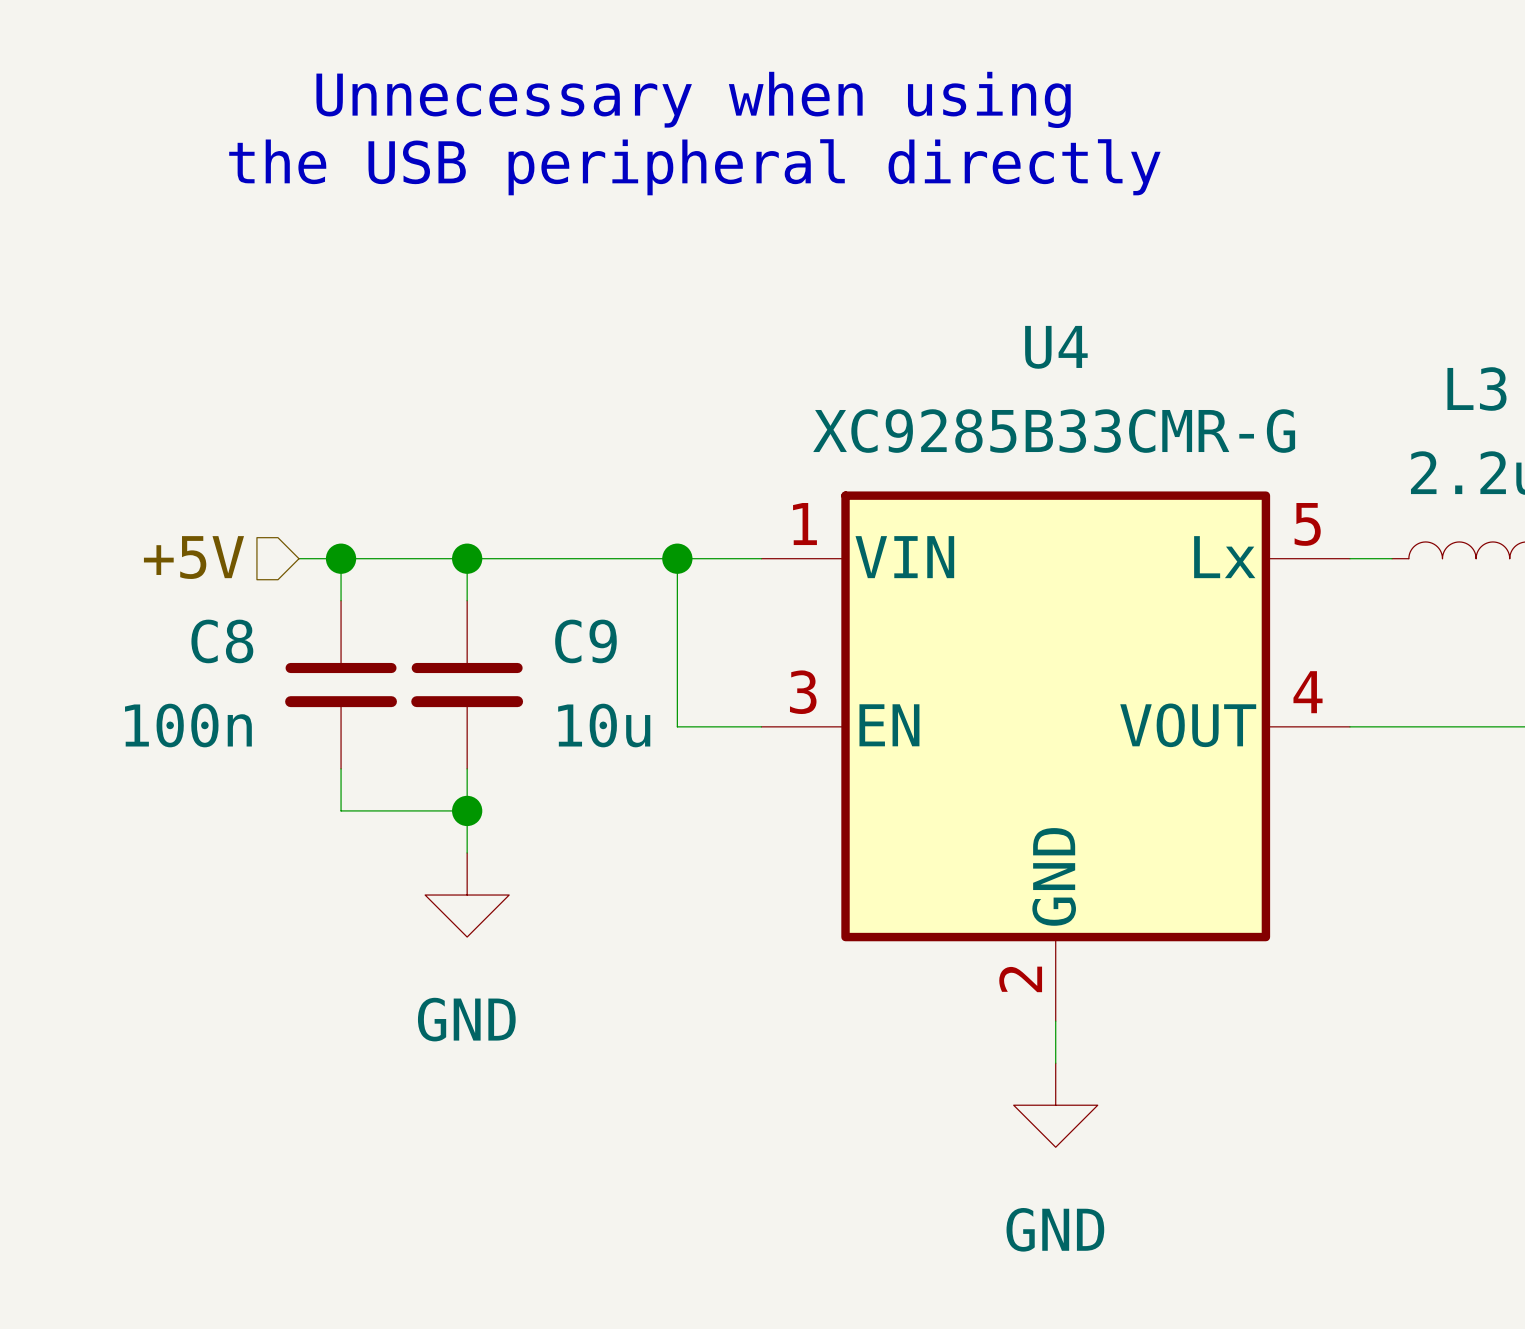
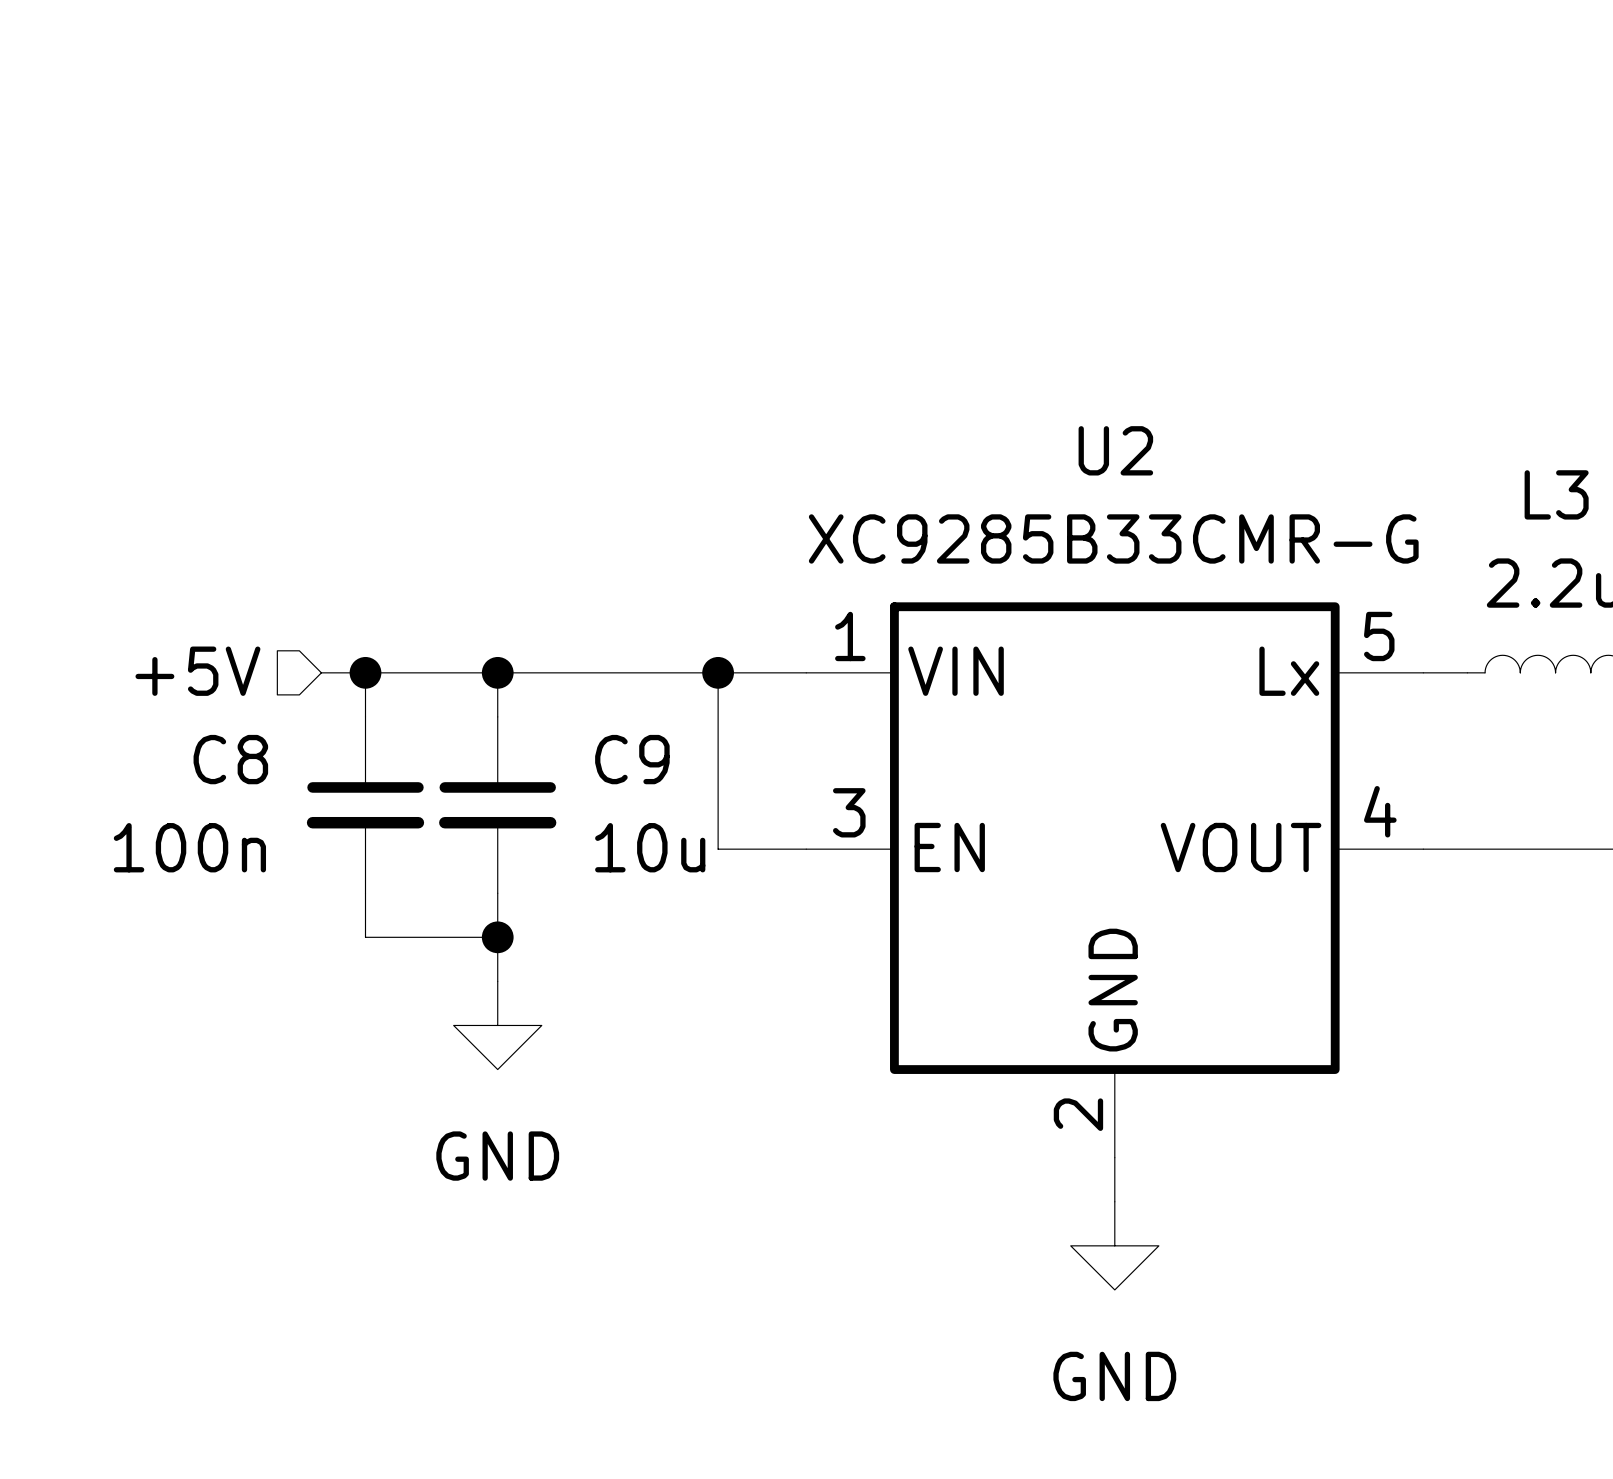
text: Unnecessary when using (693, 99) -> none
text: the USB peripheral directly (694, 167) -> none
U4 name: U4 (1056, 347) -> U2 (1115, 450)

